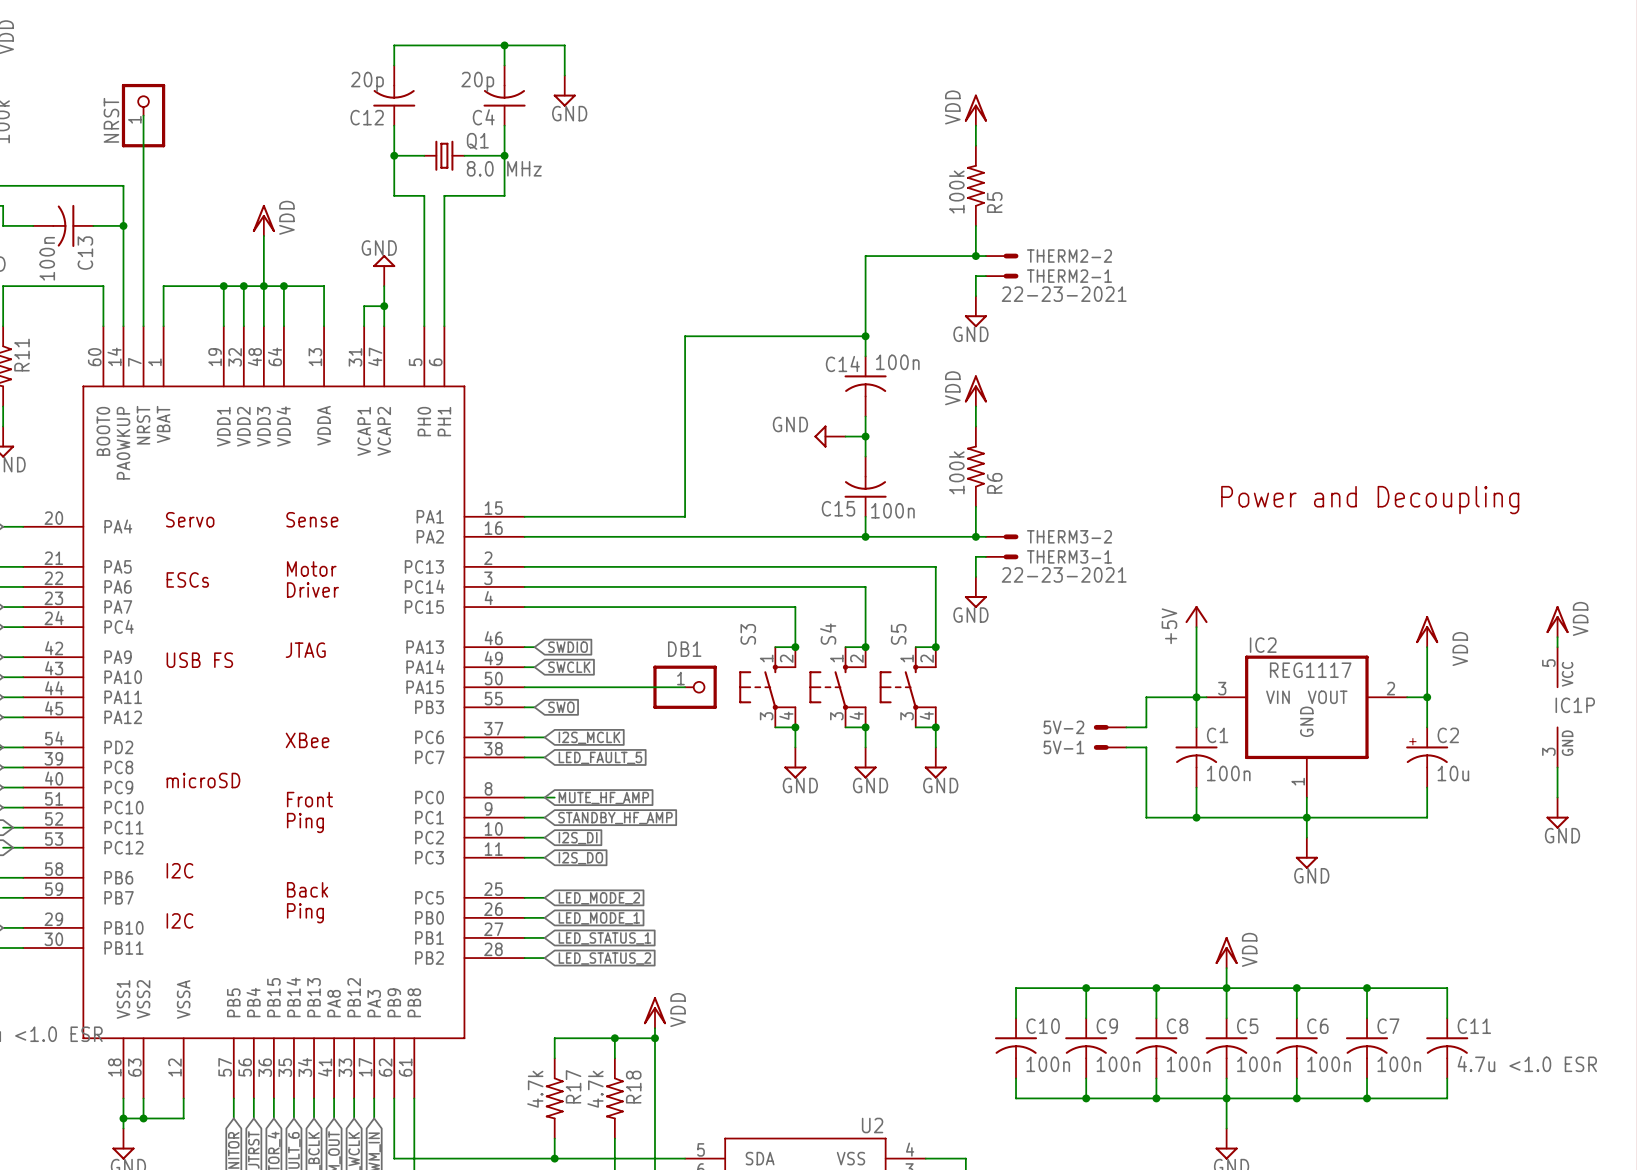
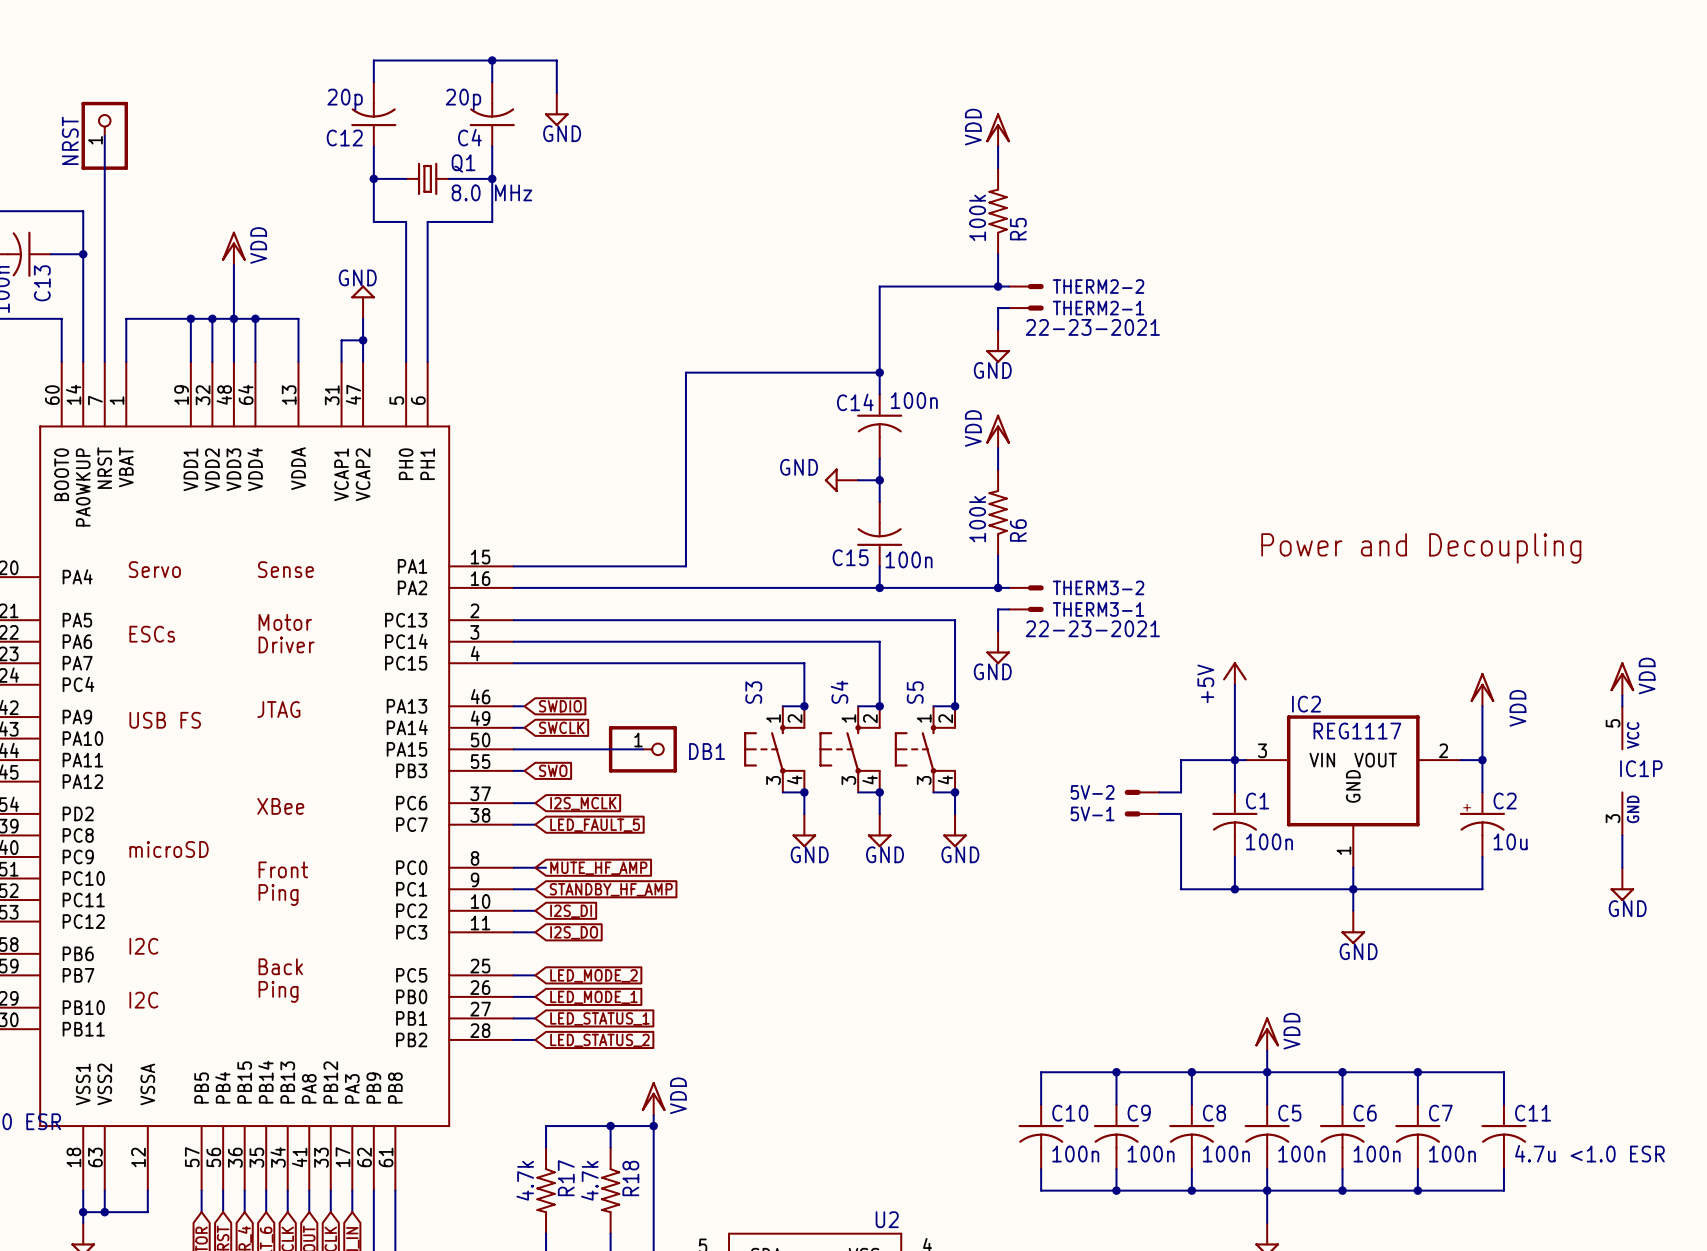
DB1 name position: DB1 (684, 649) -> DB1 (707, 751)
wire: (644, 687) (685, 687) -> none
DB1 position: (685, 687) -> (642, 749)

